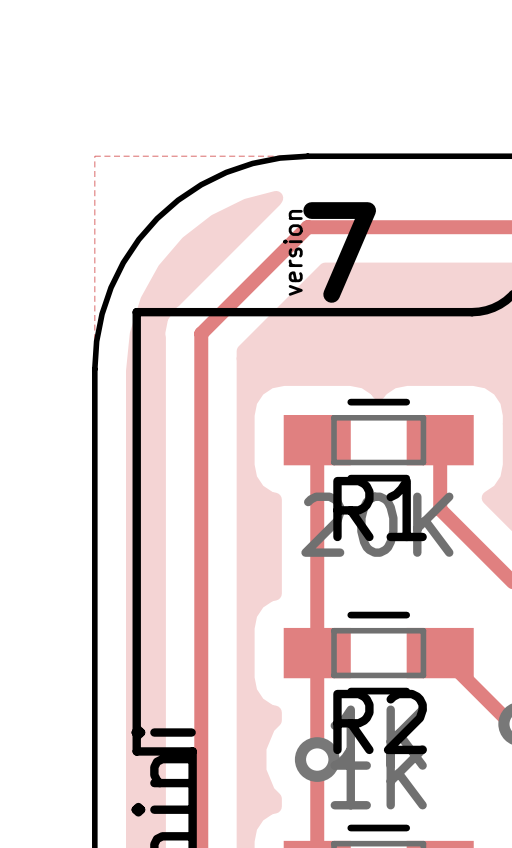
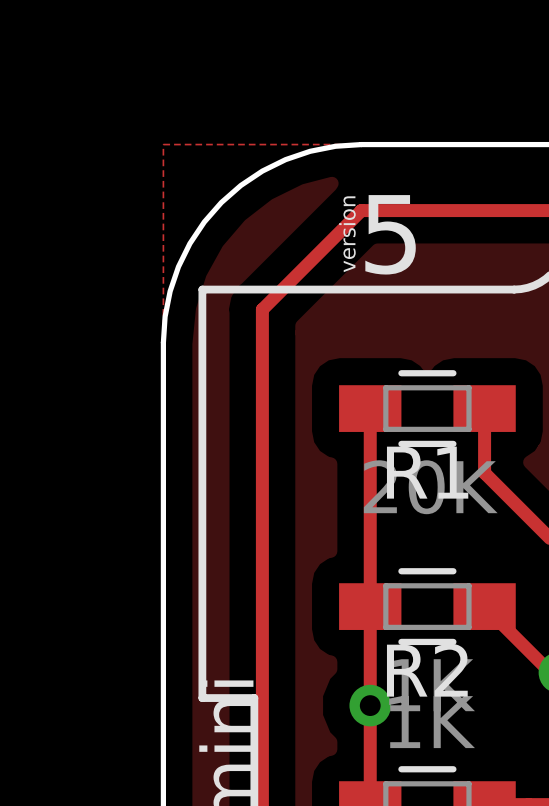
text: 7 (339, 252) -> 5 (390, 234)

